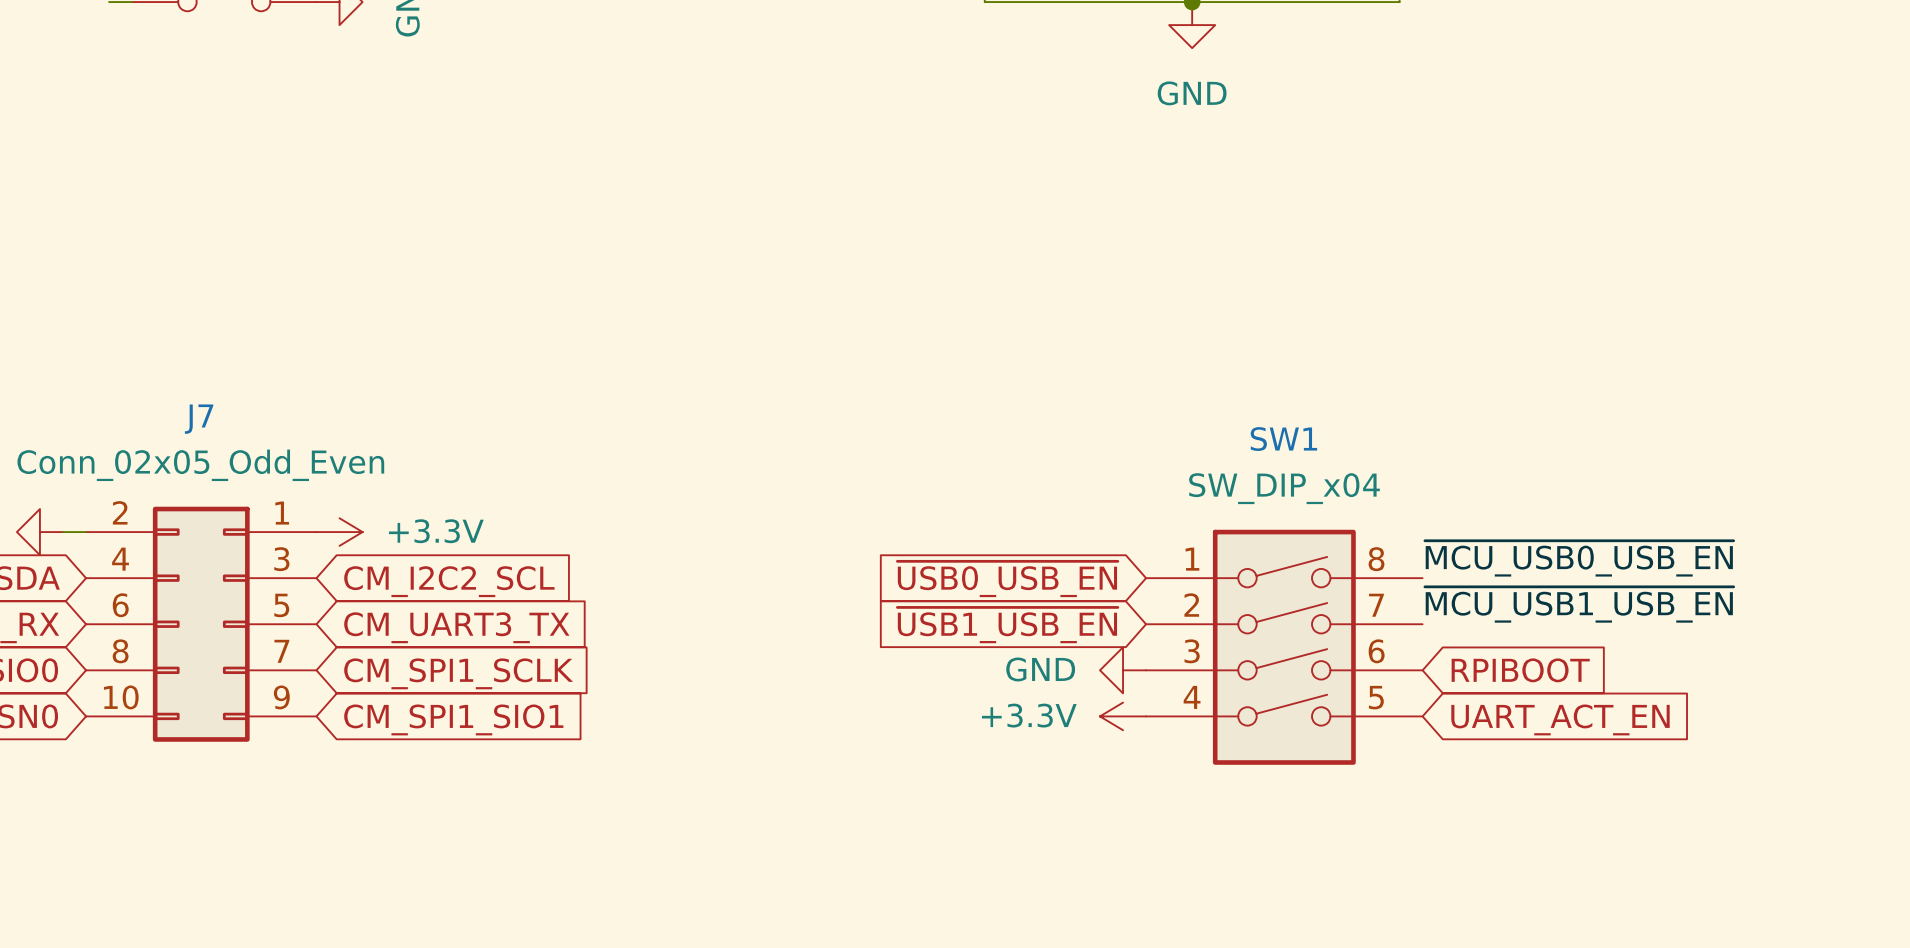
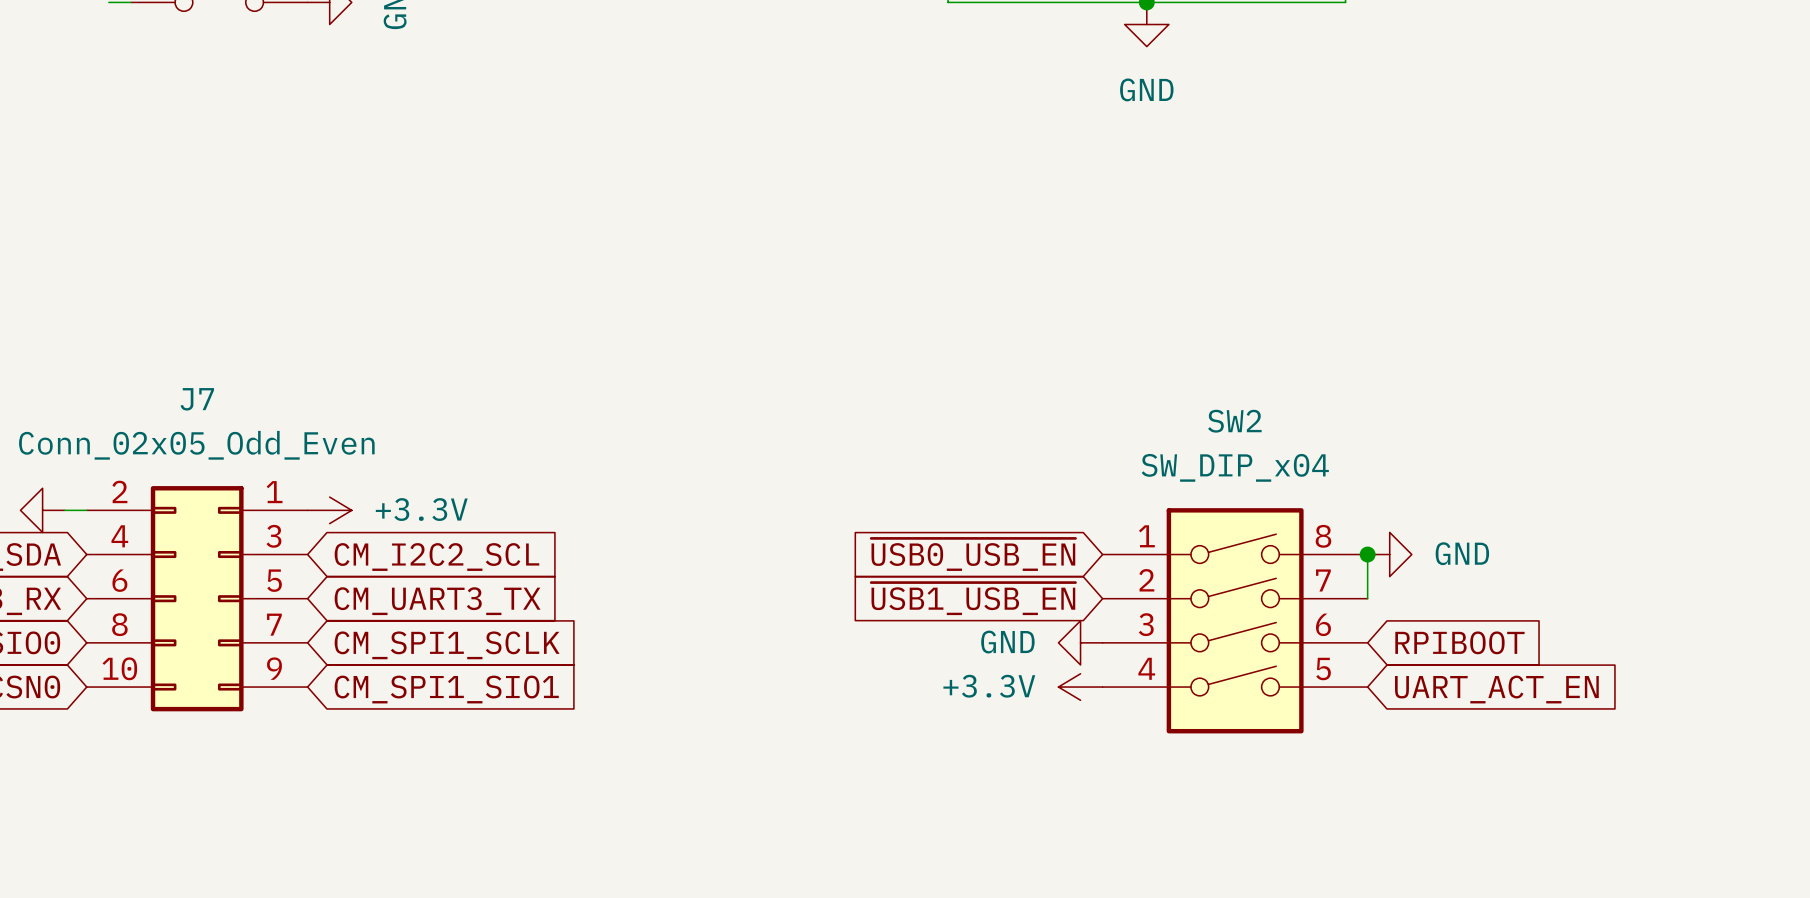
SW1 name: SW1 (1283, 439) -> SW2 (1234, 421)
label: ~{MCU_USB0_USB_EN} (1579, 558) -> none
wire: none -> (1367, 554) (1367, 598)
junction: none -> (1367, 554)
power symbol: none -> GND (1389, 554)
label: ~{MCU_USB1_USB_EN} (1579, 604) -> none

